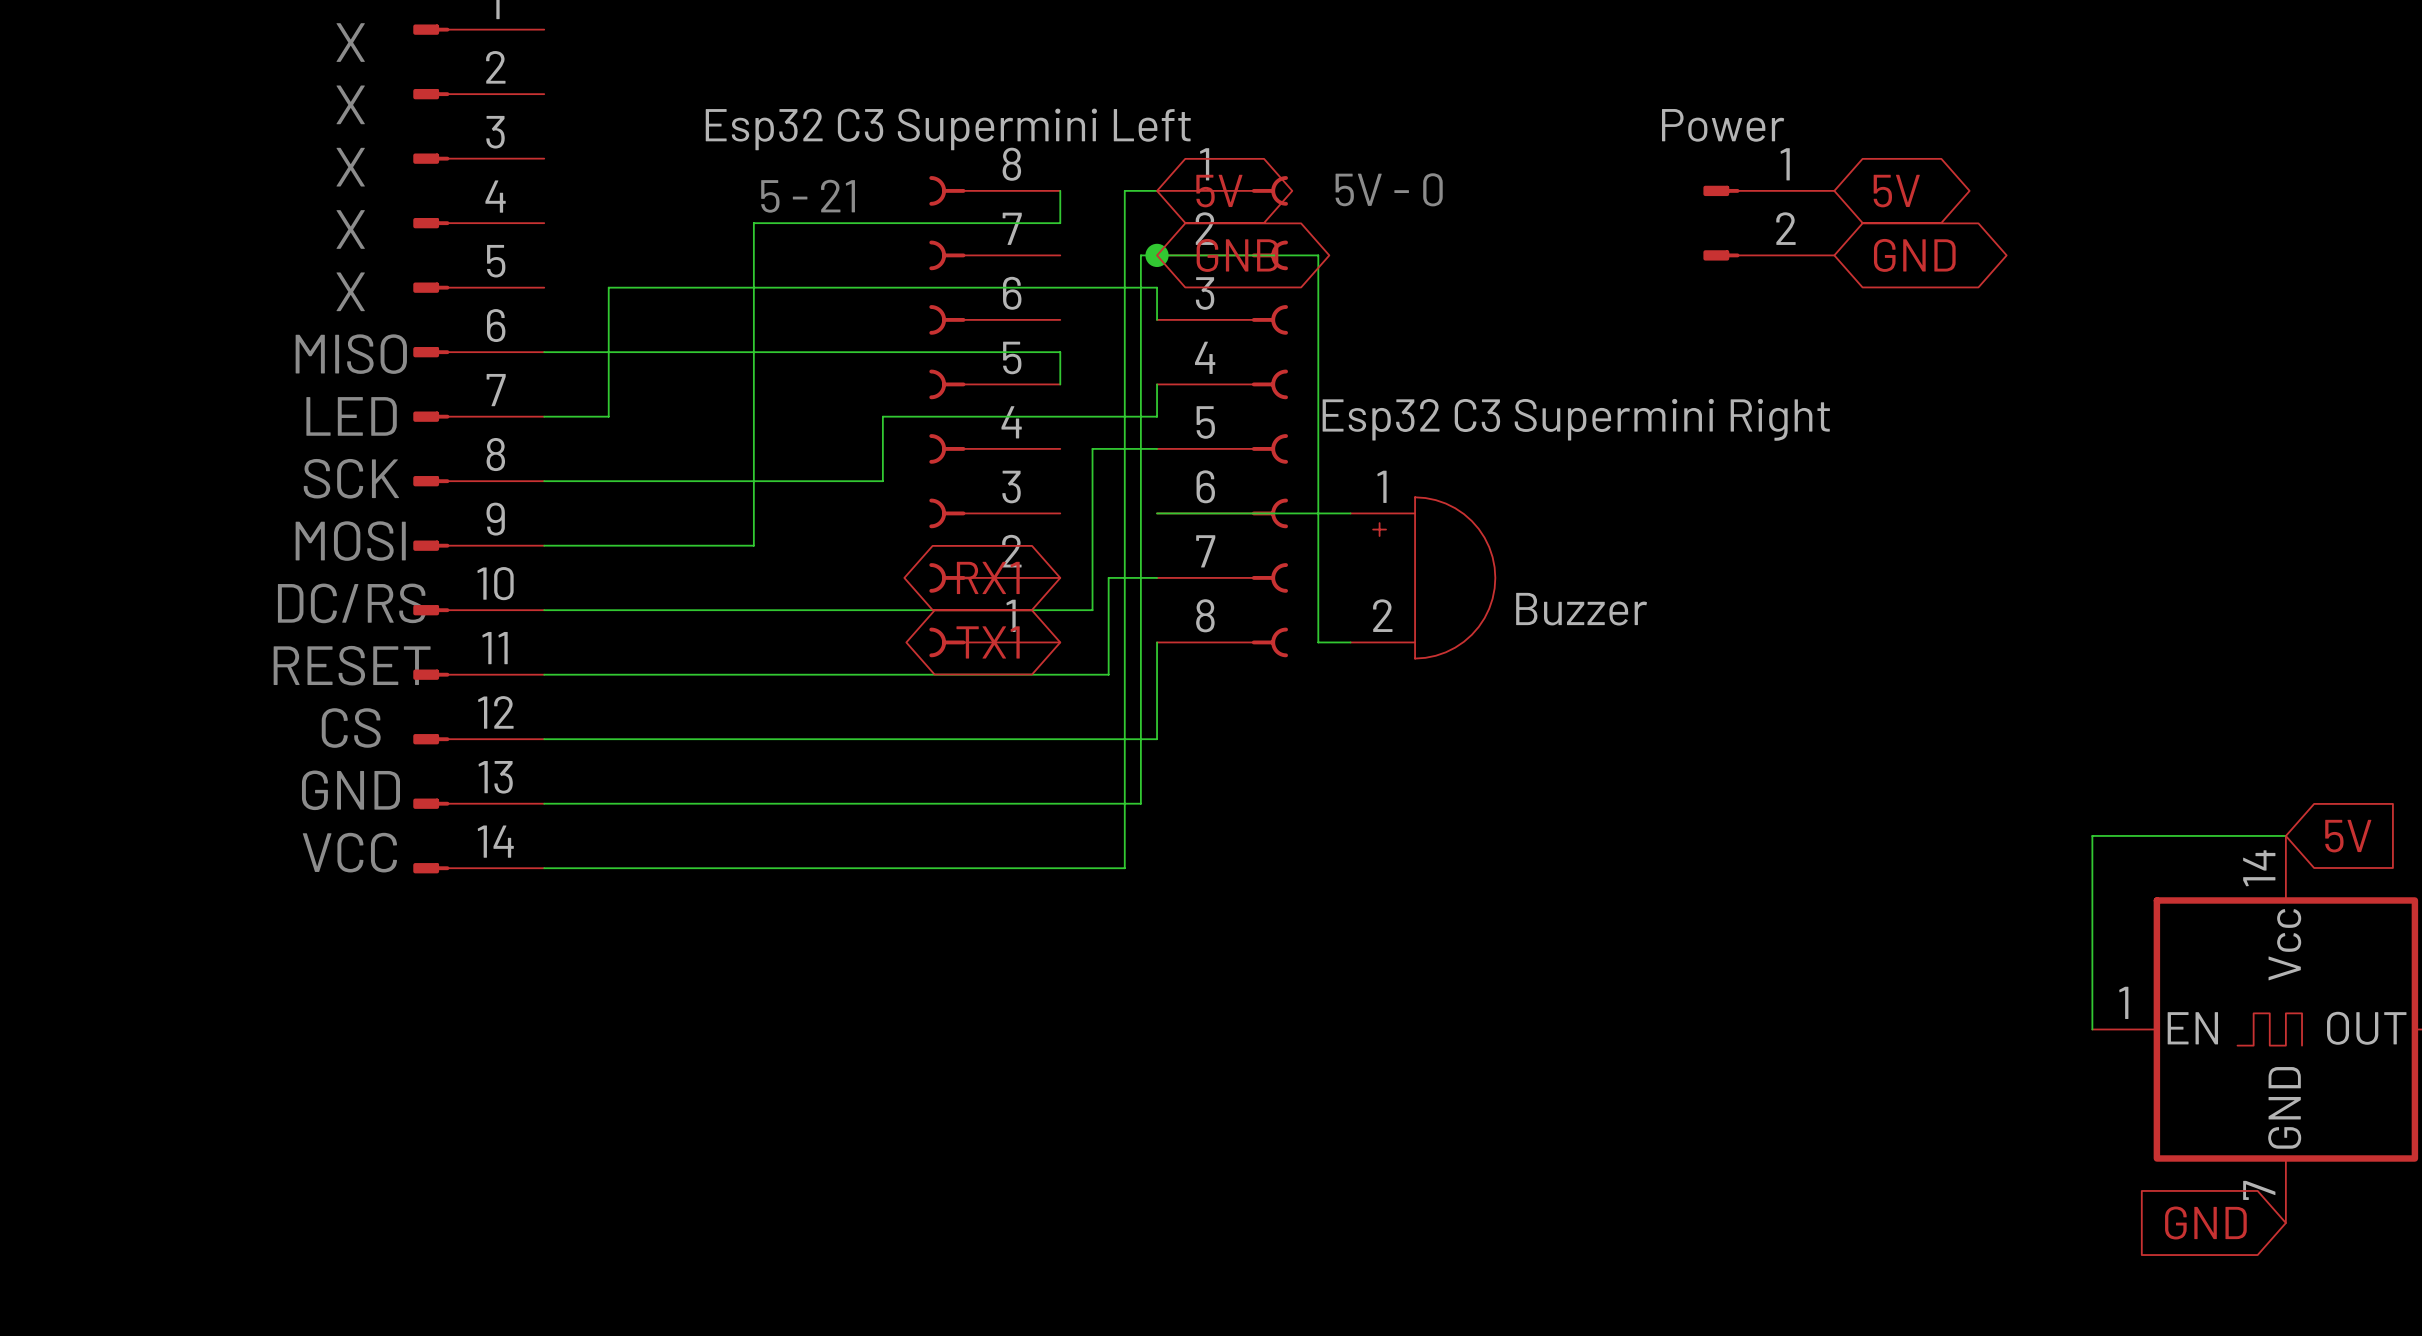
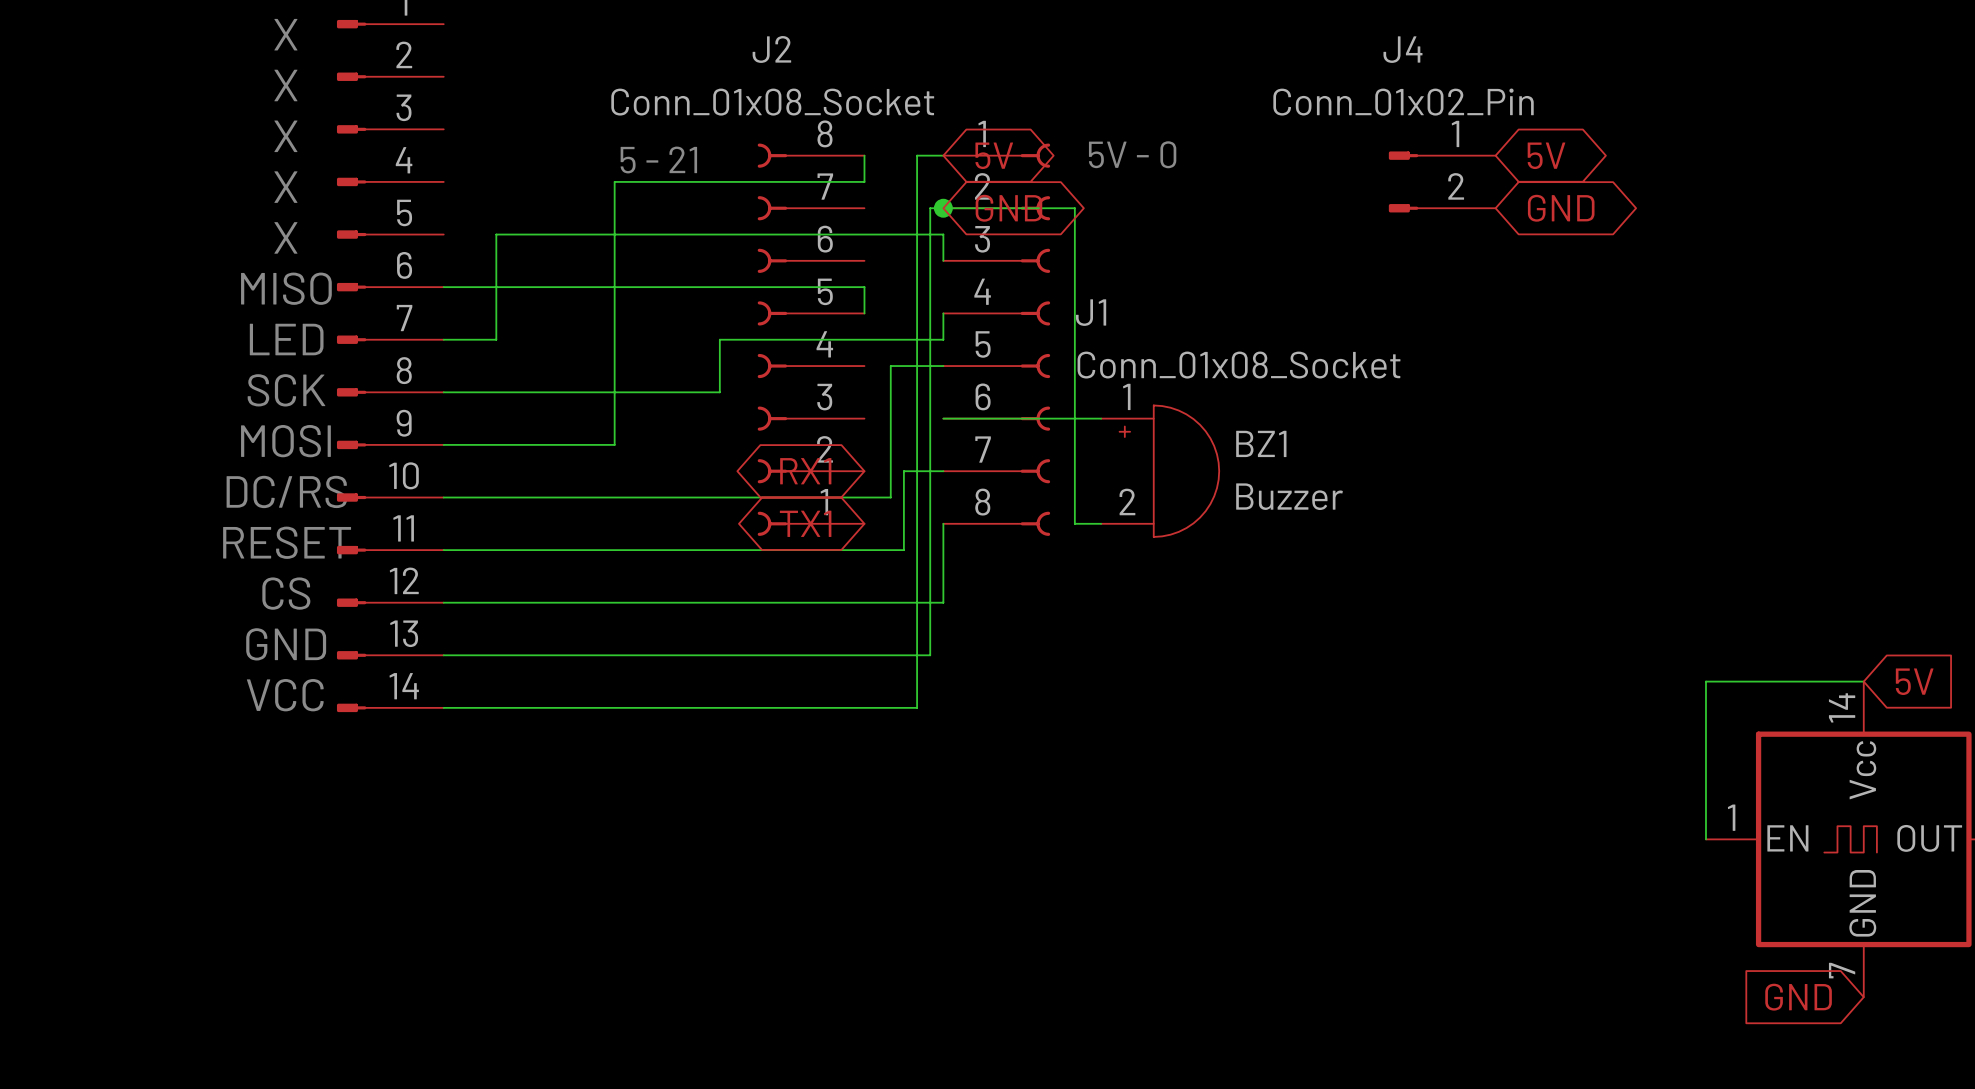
J2 name: none -> J2 (771, 49)
J4 name: none -> J4 (1402, 49)
J4 value: Power (1723, 125) -> Conn_01x02_Pin (1403, 102)
J2 value: Esp32 C3 Supermini Left (948, 129) -> Conn_01x08_Socket (772, 102)
J1 name: none -> J1 (1091, 312)
J1 value: Esp32 C3 Supermini Right (1576, 419) -> Conn_01x08_Socket (1238, 365)
BZ1 name: none -> BZ1 (1261, 443)

